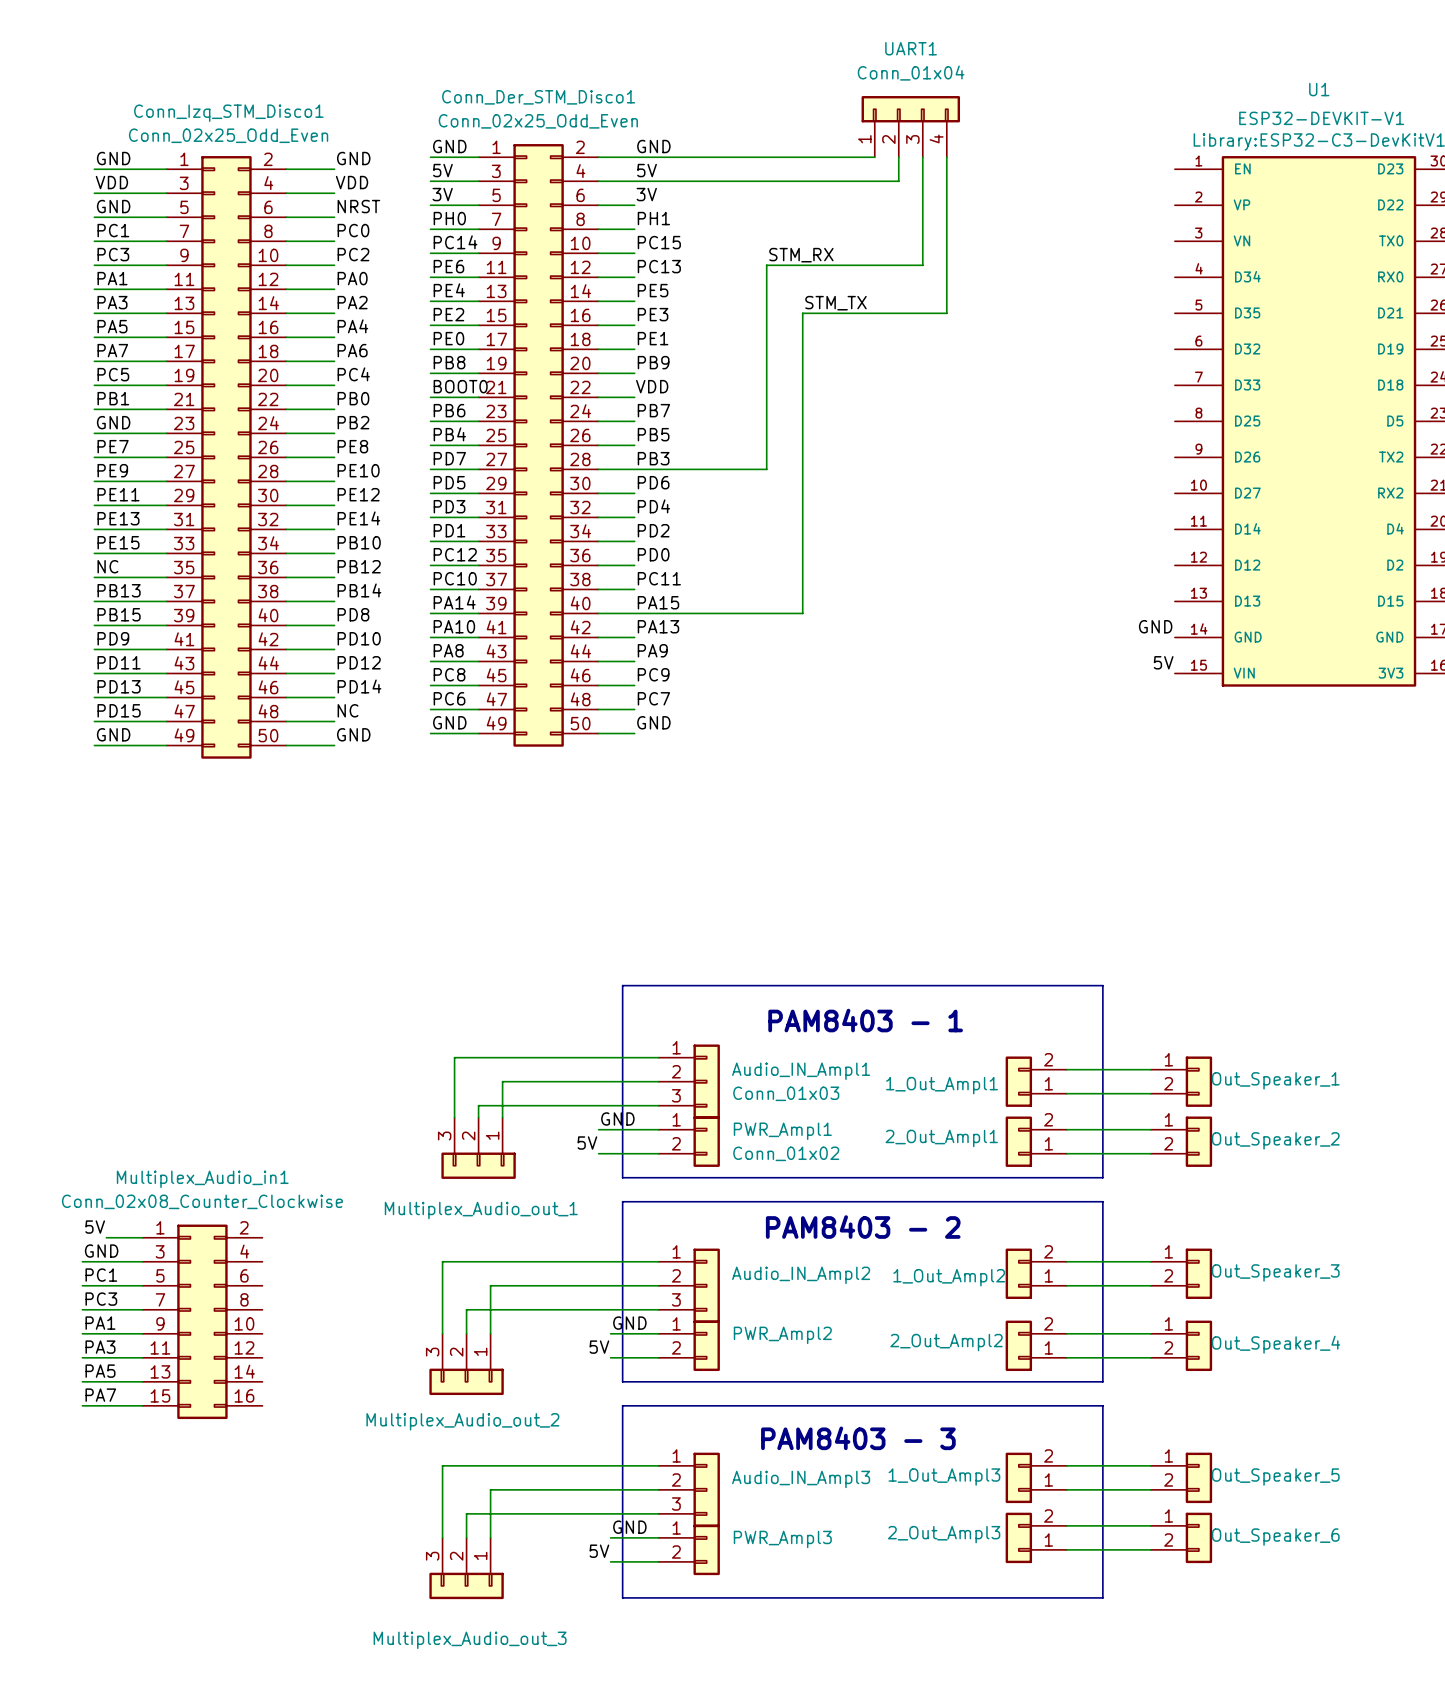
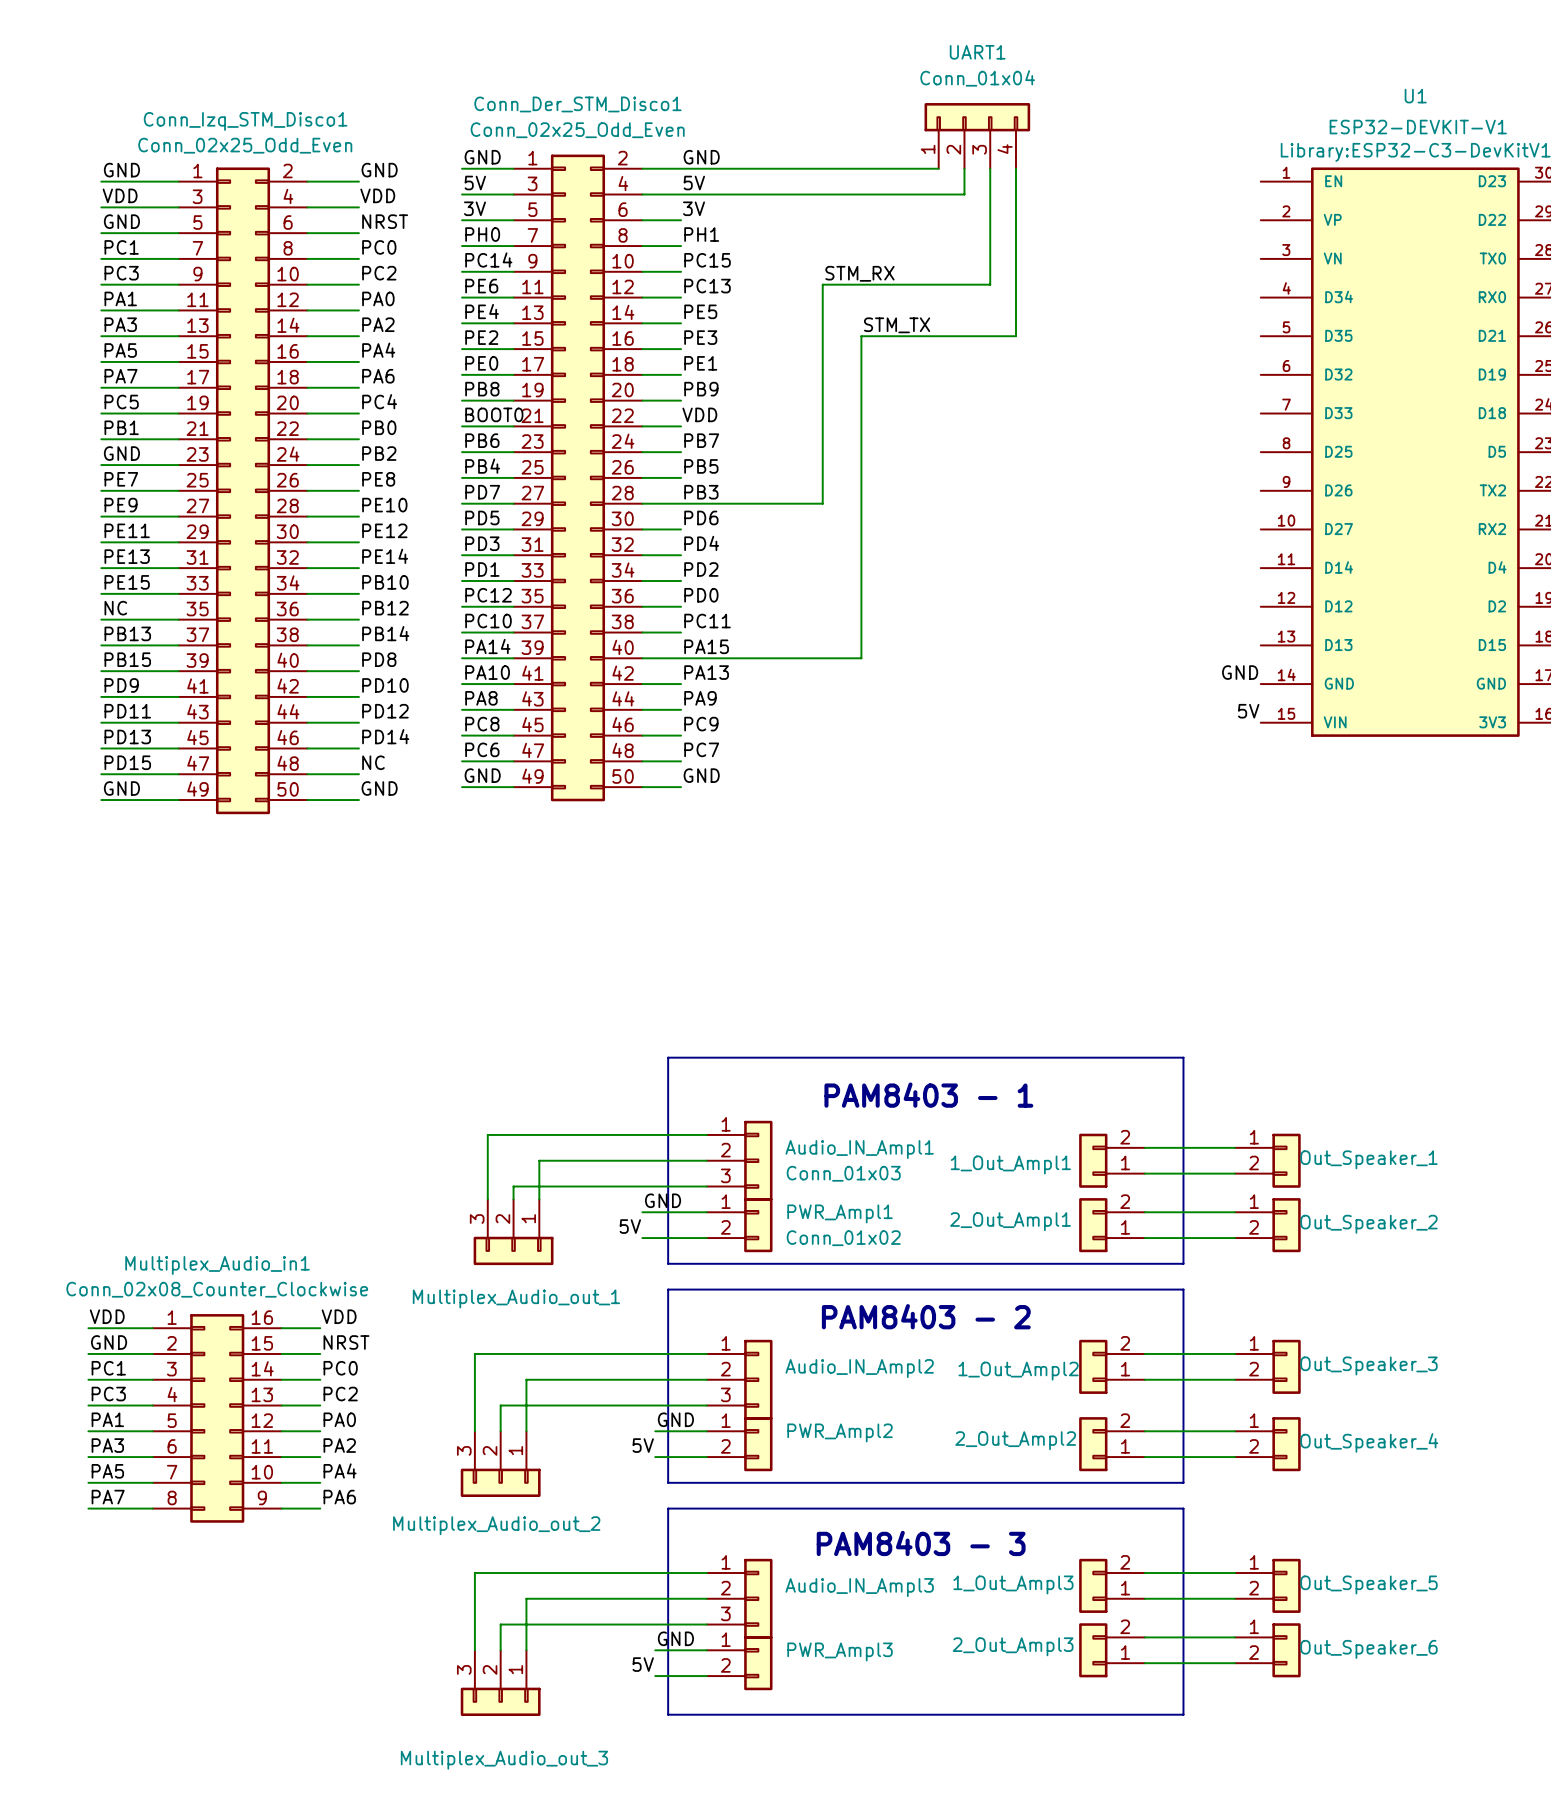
Multiplex_Audio_in1 symbol: [142, 1224, 263, 1420] -> [152, 1314, 282, 1523]
label: 5V (95, 1227) -> none
label: none -> VDD (107, 1316)
label: none -> VDD (339, 1316)
wire: none -> (88, 1328) (114, 1328)
wire: none -> (281, 1328) (320, 1328)
label: none -> NRST (346, 1342)
wire: none -> (281, 1353) (320, 1353)
label: none -> PC0 (340, 1368)
wire: none -> (281, 1379) (320, 1379)
label: none -> PC2 (340, 1394)
wire: none -> (281, 1405) (320, 1405)
label: none -> PA0 (339, 1419)
wire: none -> (281, 1431) (320, 1431)
label: none -> PA2 (339, 1445)
wire: none -> (281, 1457) (320, 1457)
label: none -> PA4 (340, 1471)
wire: none -> (281, 1482) (320, 1482)
label: none -> PA6 (339, 1497)
wire: none -> (281, 1508) (320, 1508)

